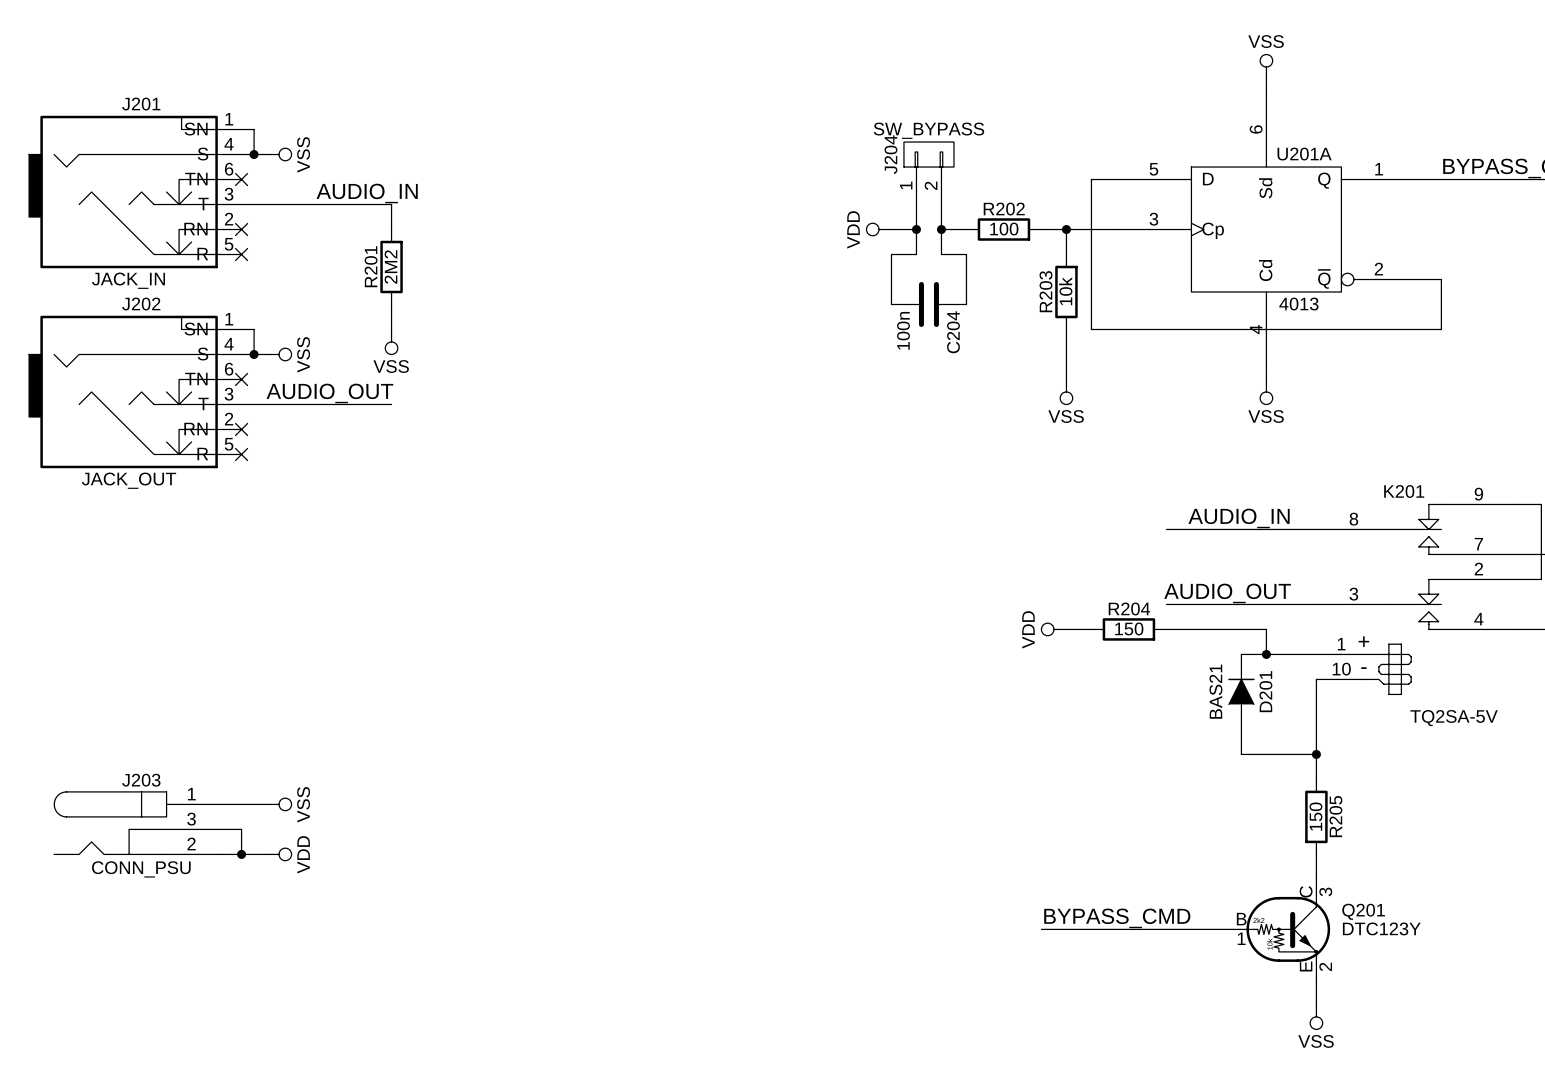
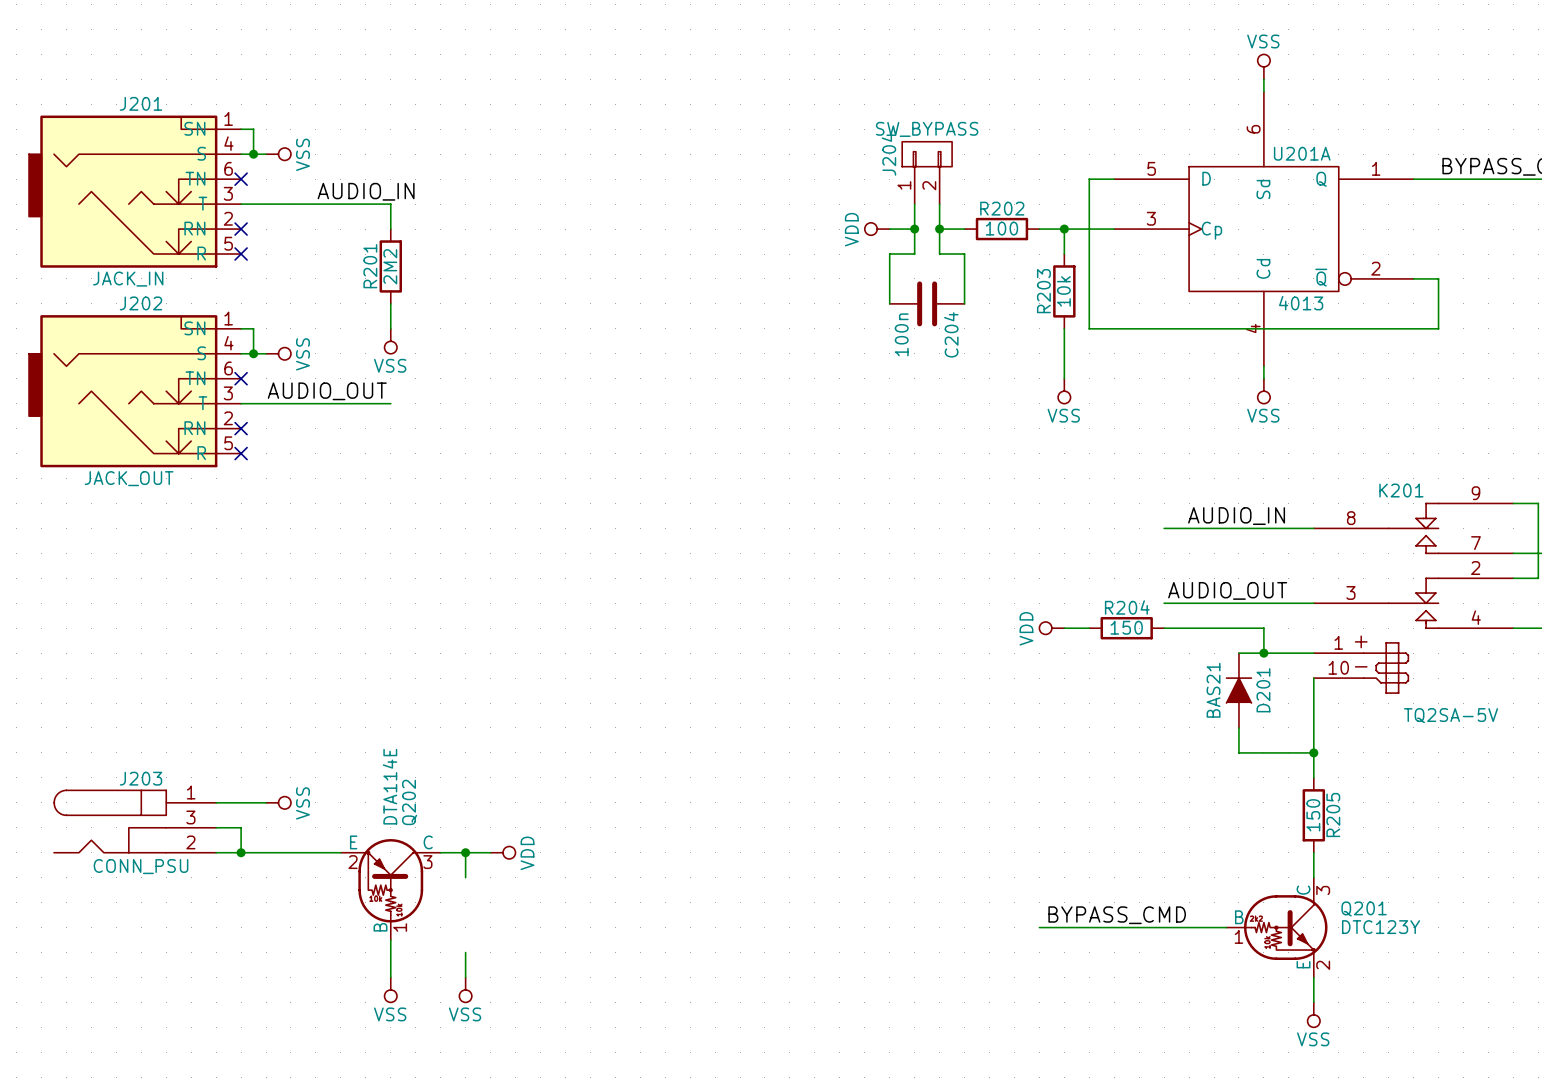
wire: none -> (266, 852) (340, 852)
power symbol position: VDD (279, 854) -> VDD (503, 852)
wire: none -> (440, 852) (490, 852)
wire: none -> (465, 852) (465, 877)
junction: none -> (465, 852)
Q202: none -> DTA114E (390, 889)
wire: none -> (390, 940) (390, 977)
wire: none -> (465, 952) (465, 977)
power symbol: none -> VSS (390, 989)
power symbol: none -> VSS (465, 989)

